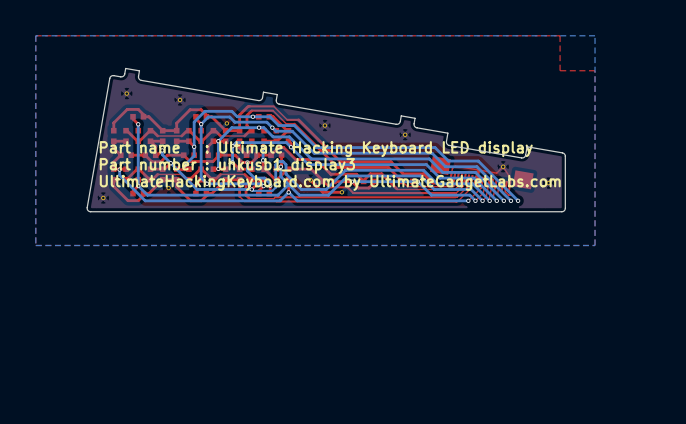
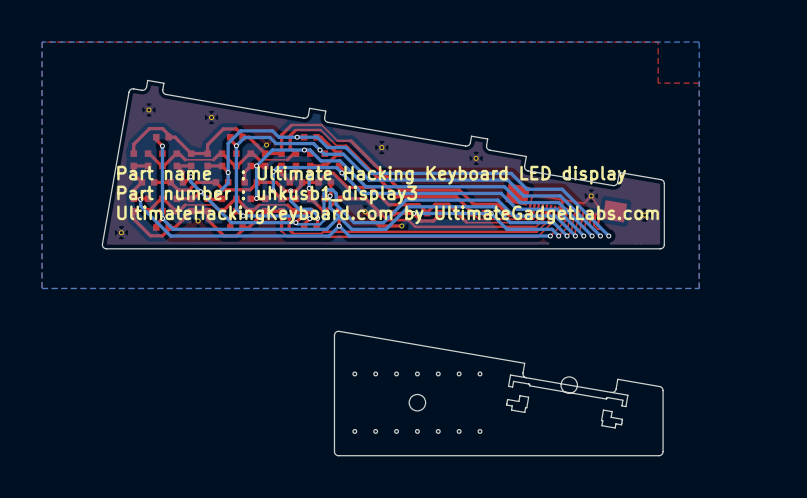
round board edge: none -> [352, 371, 358, 377]
round board edge: none -> [373, 371, 378, 377]
round board edge: none -> [394, 371, 399, 377]
round board edge: none -> [415, 371, 420, 377]
round board edge: none -> [436, 371, 441, 377]
round board edge: none -> [456, 371, 462, 377]
round board edge: none -> [477, 371, 483, 377]
board edge: none -> (510, 375) (627, 395) (625, 406) (621, 405) (622, 400) (529, 385) (528, 384) (513, 381) (512, 387) (508, 386) (510, 375)
round board edge: none -> [560, 376, 578, 394]
board edge: none -> (526, 377) (522, 374) (524, 363) (337, 331) (334, 335) (334, 453) (338, 455) (661, 454) (663, 451) (662, 387) (617, 379) (615, 390) (611, 392)
round board edge: none -> [408, 394, 427, 412]
board edge: none -> (519, 395) (528, 397) (524, 412) (511, 410) (512, 406) (506, 405) (507, 399) (518, 401) (519, 395)
board edge: none -> (603, 410) (612, 411) (611, 417) (622, 419) (621, 424) (615, 423) (615, 427) (601, 425) (603, 410)
round board edge: none -> [352, 429, 358, 434]
round board edge: none -> [373, 429, 378, 434]
round board edge: none -> [394, 429, 399, 434]
round board edge: none -> [415, 429, 420, 434]
round board edge: none -> [436, 429, 441, 434]
round board edge: none -> [456, 429, 462, 434]
round board edge: none -> [477, 429, 483, 434]

